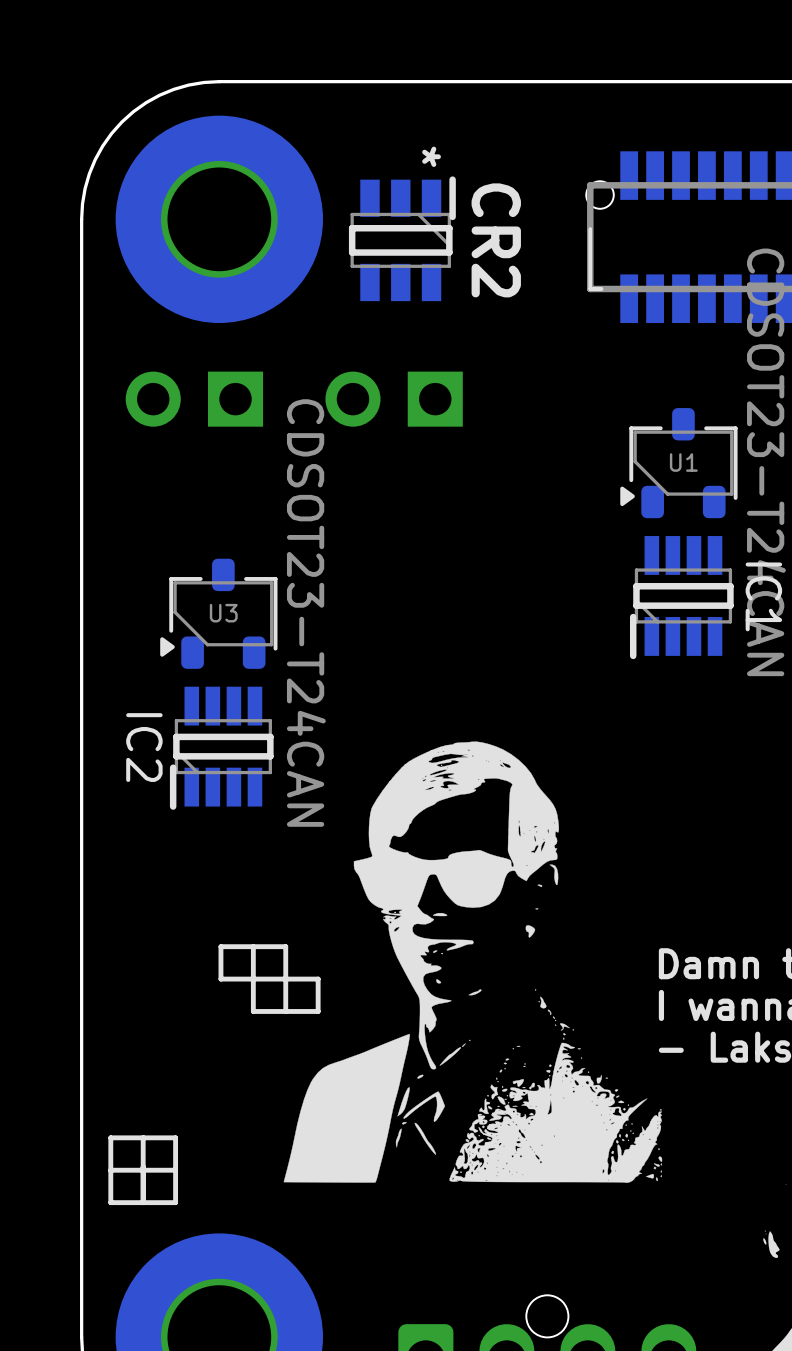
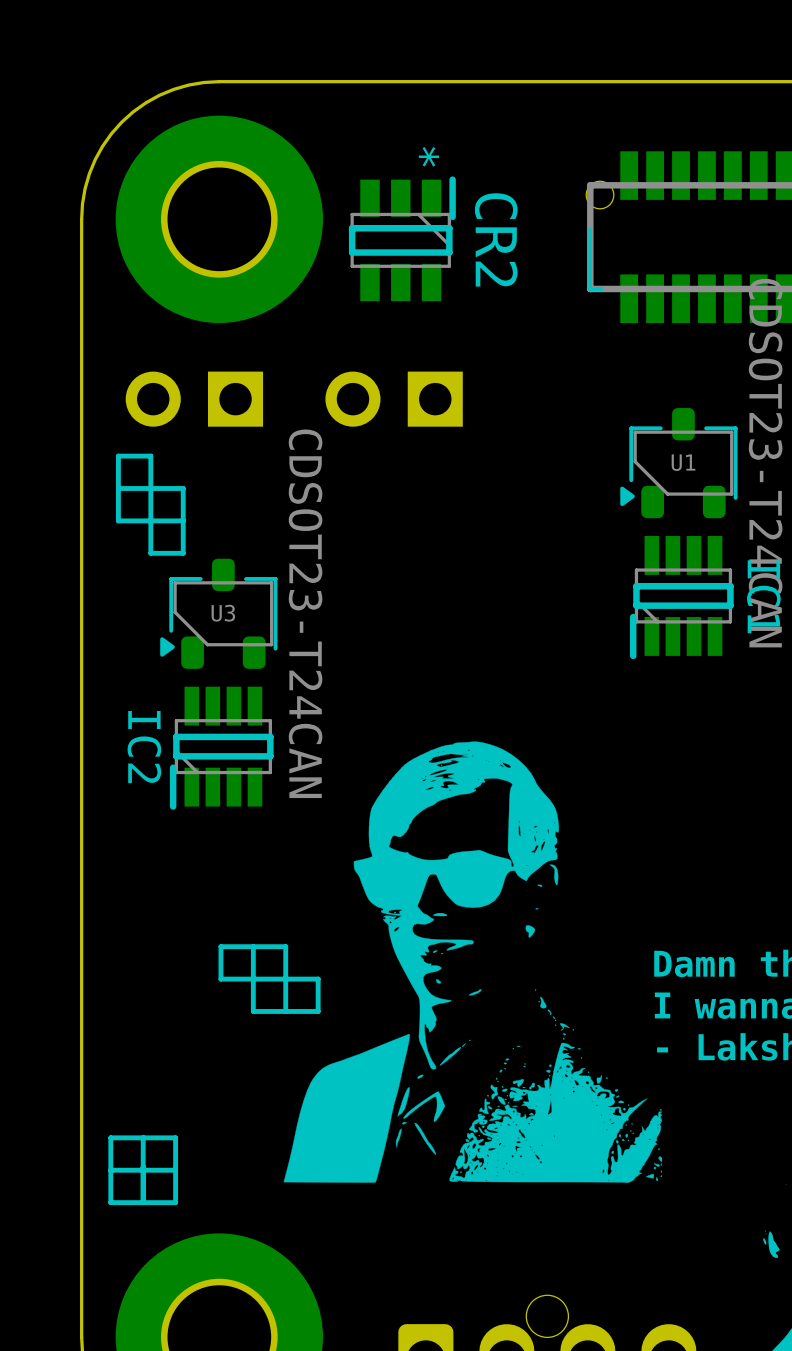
line: none -> (118, 488) (183, 488) (183, 553) (150, 553) (150, 456) (118, 456) (118, 520) (183, 520)

